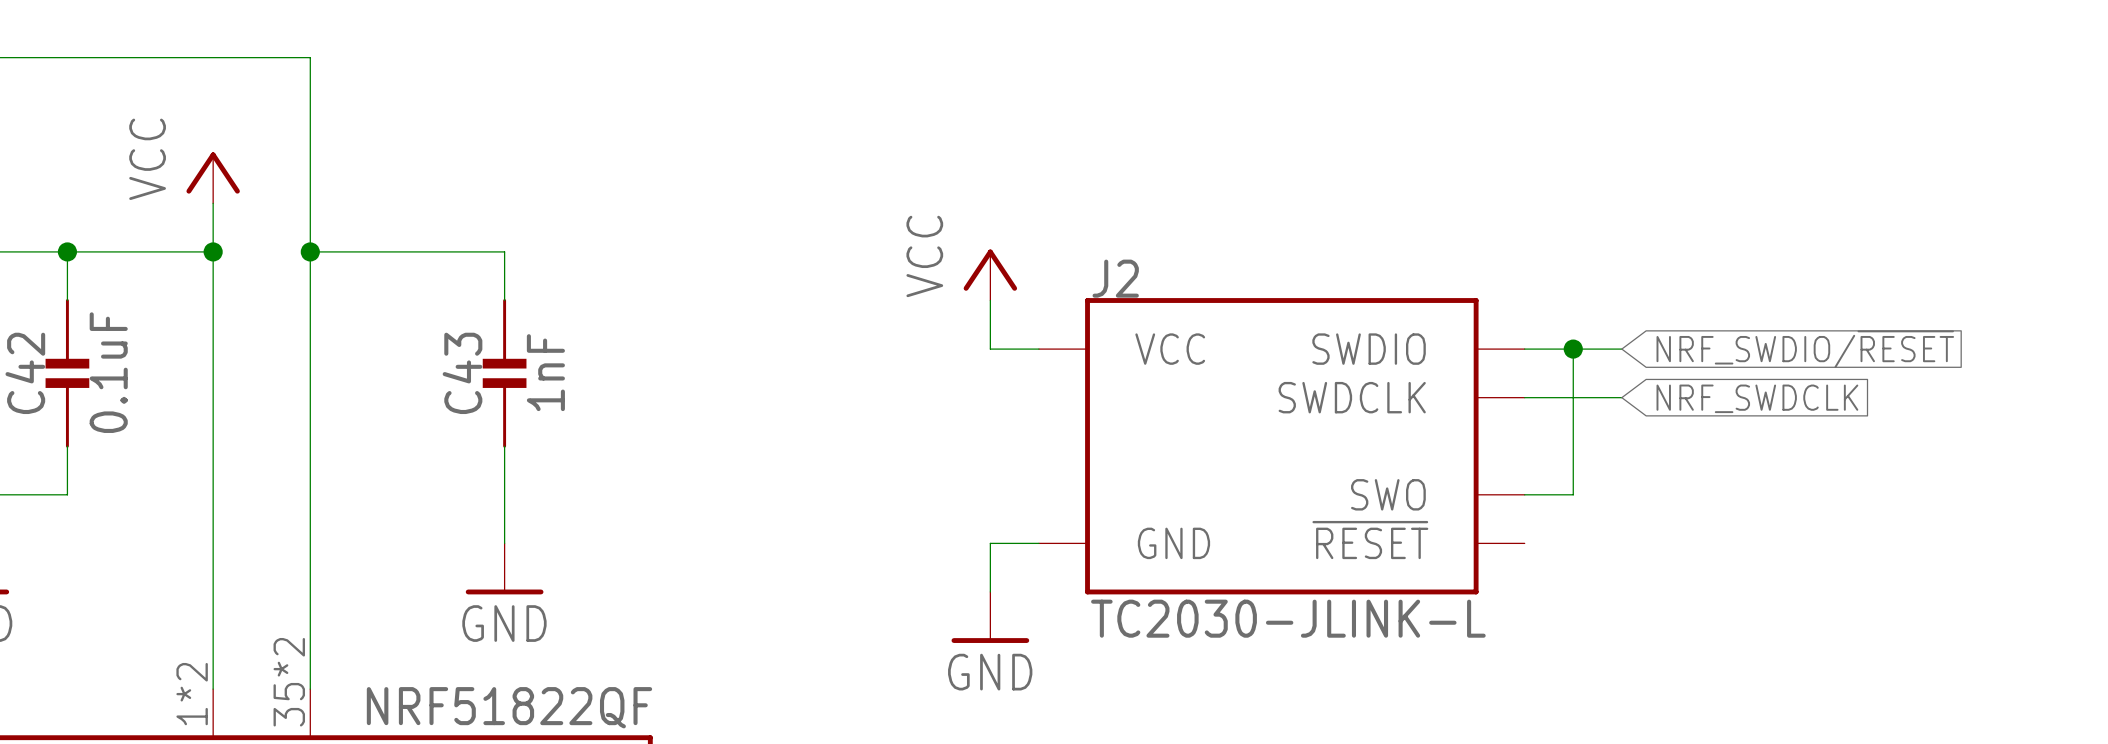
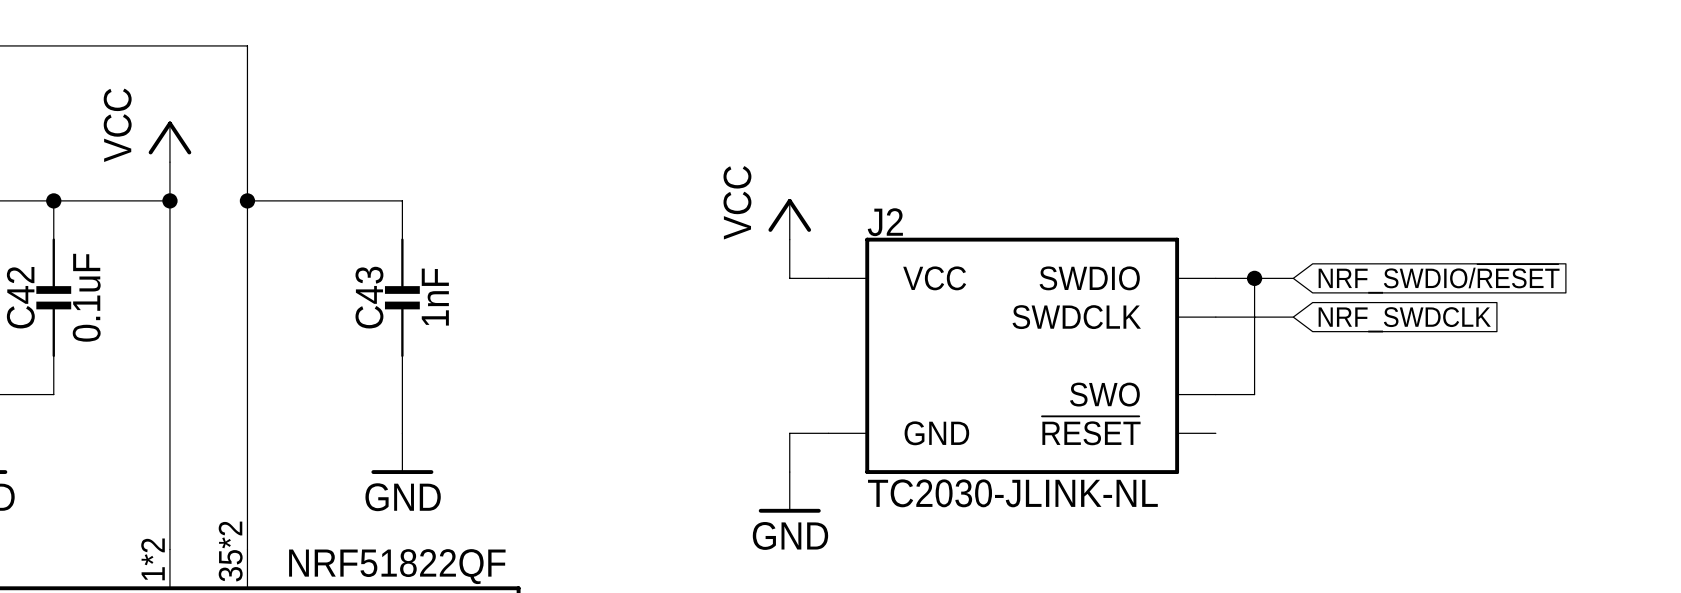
J2 value: TC2030-JLINK-L (1288, 618) -> TC2030-JLINK-NL (1012, 493)

